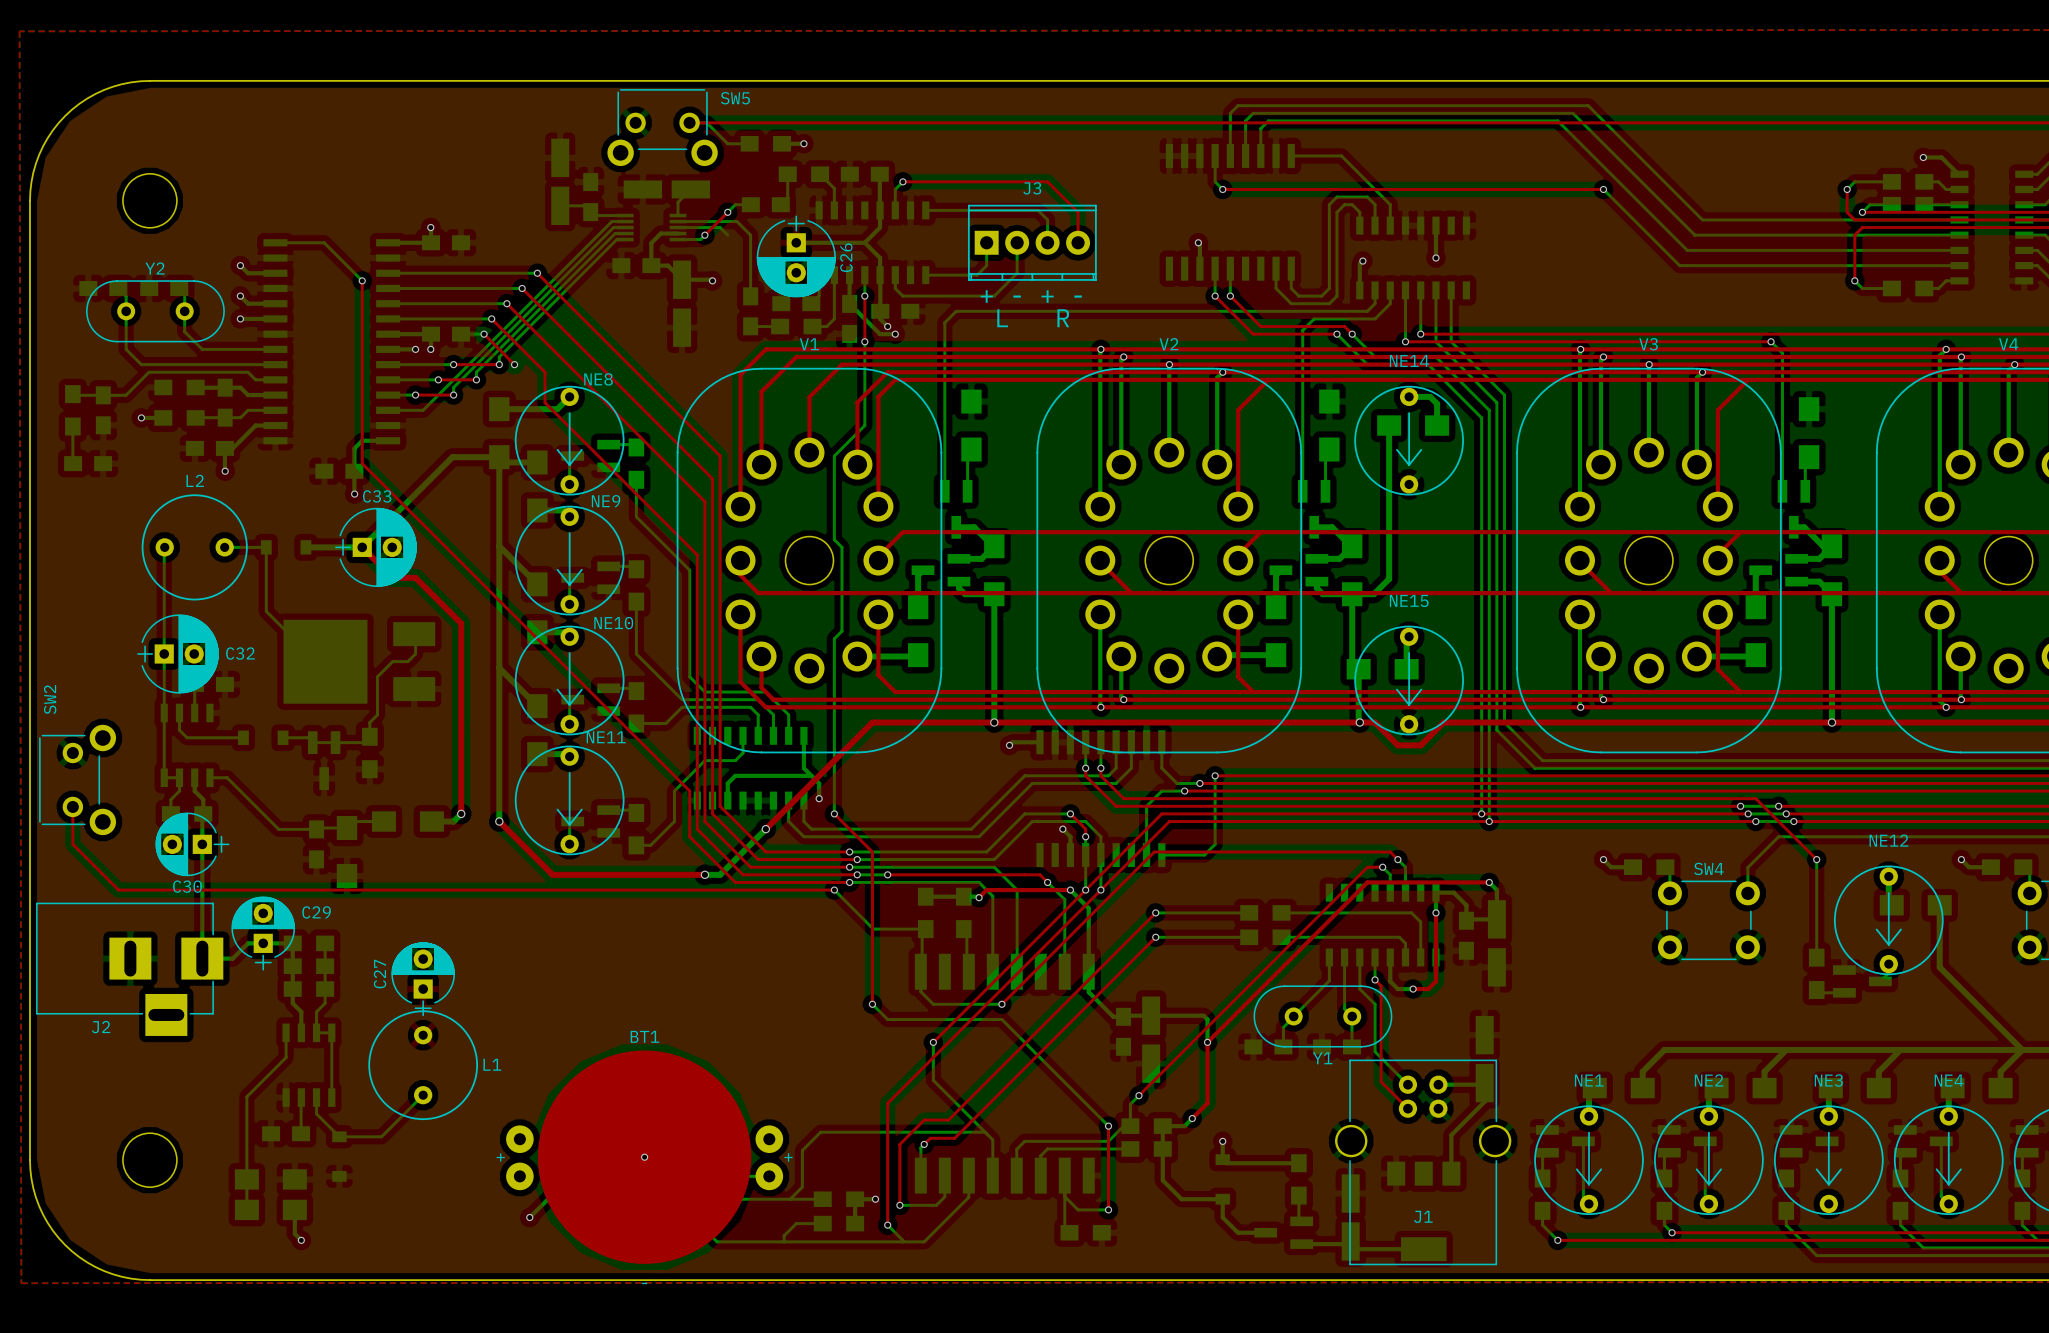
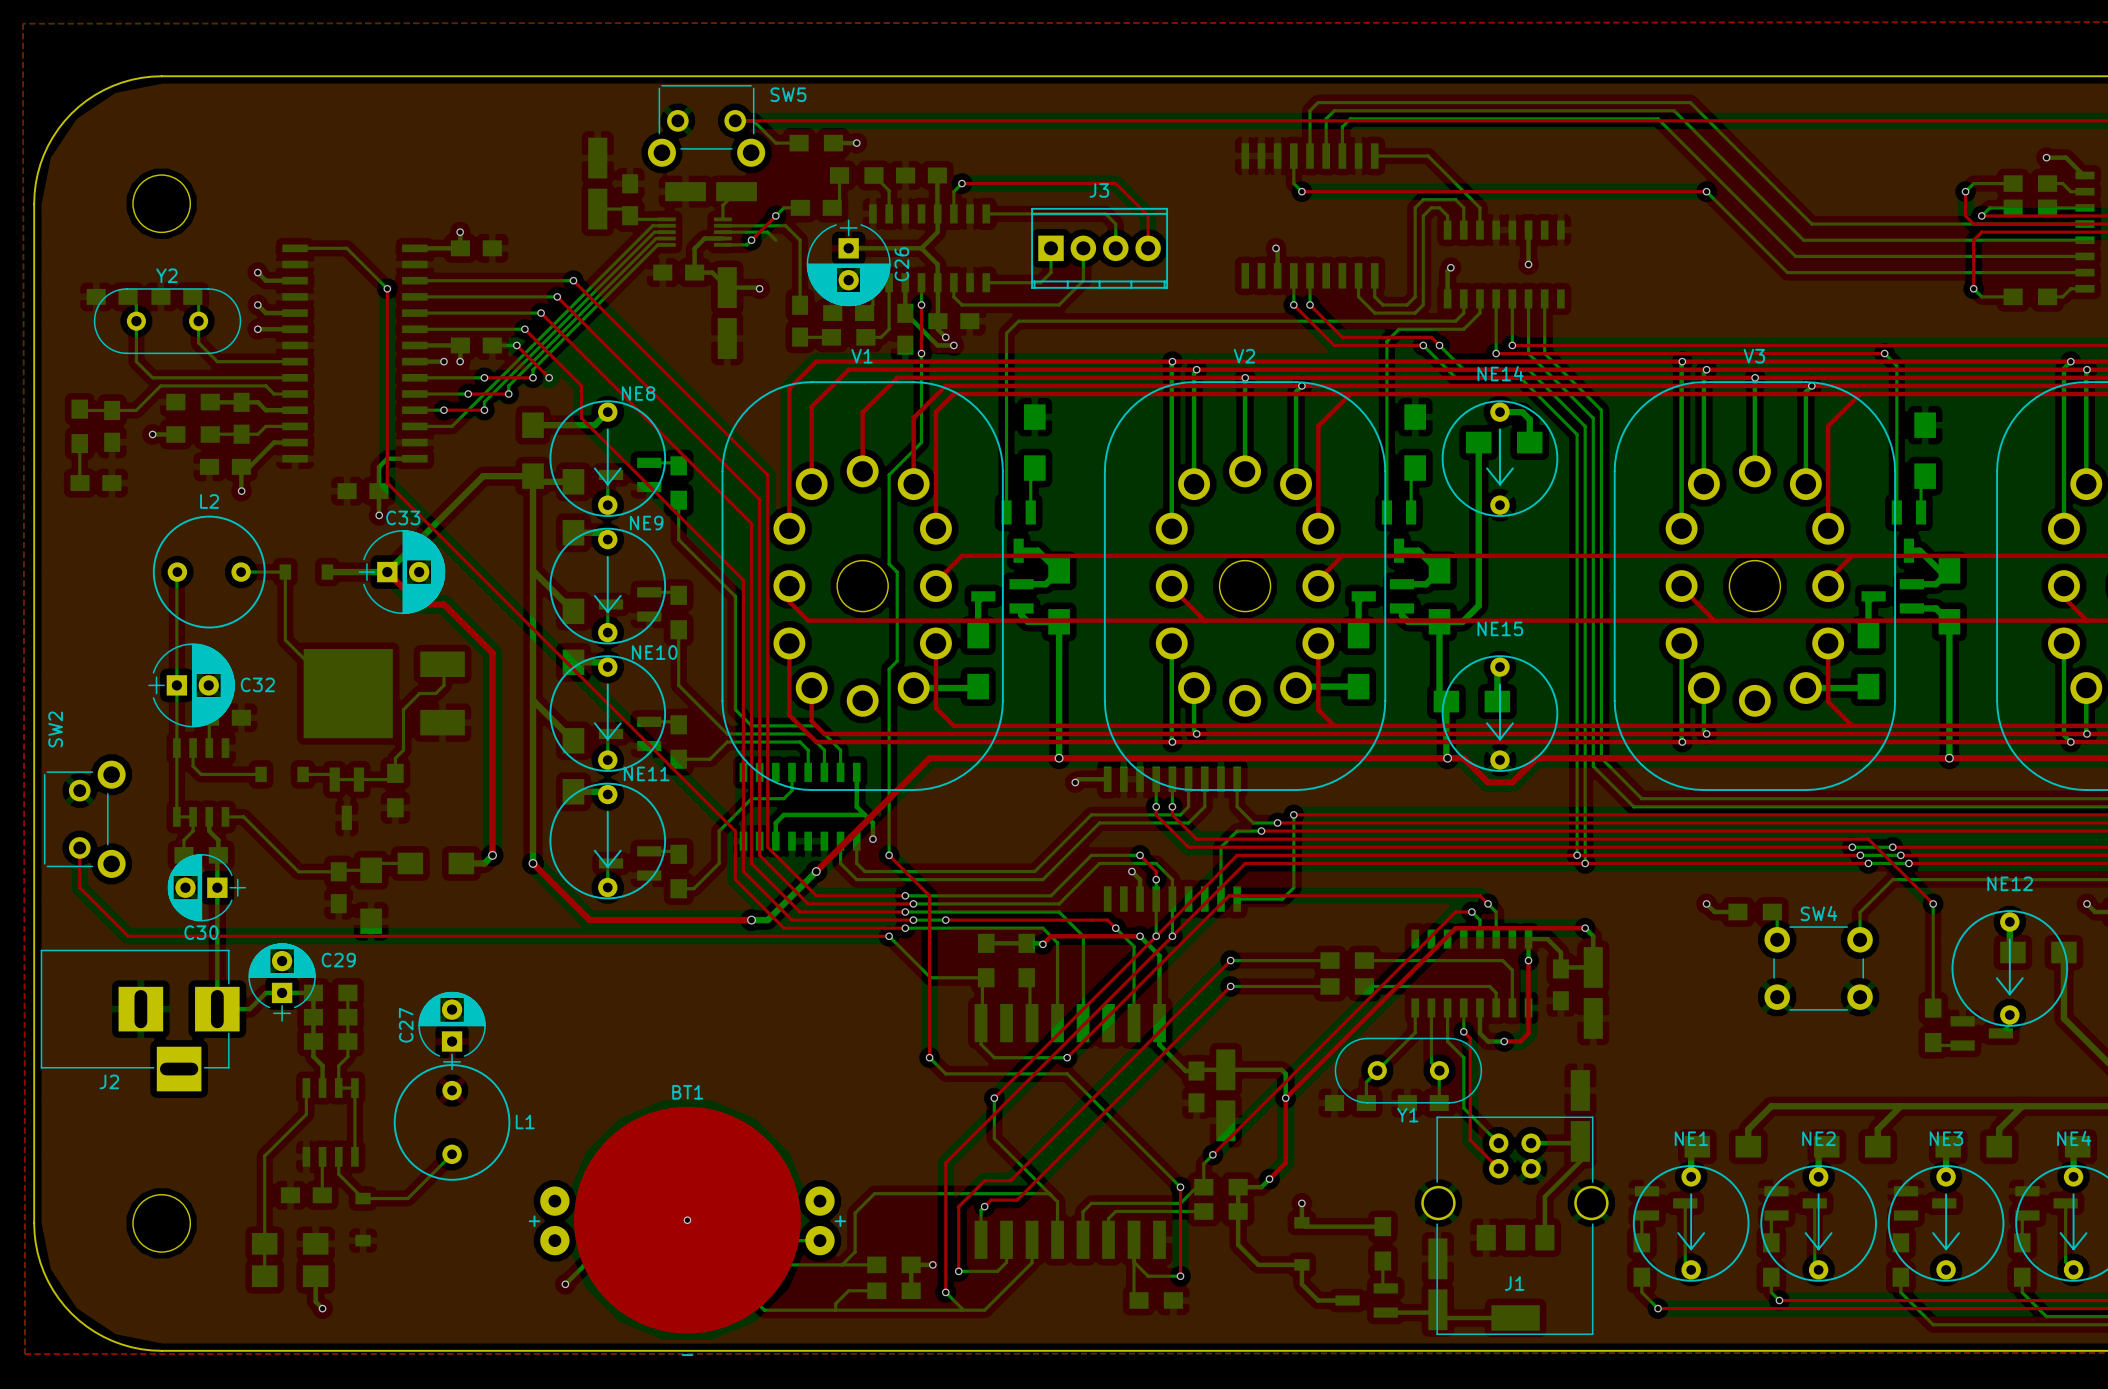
text: + (986, 296) -> none
text: - (1017, 296) -> none
text: + (1047, 296) -> none
text: - (1078, 296) -> none
text: L (1002, 318) -> none
text: R (1063, 318) -> none

